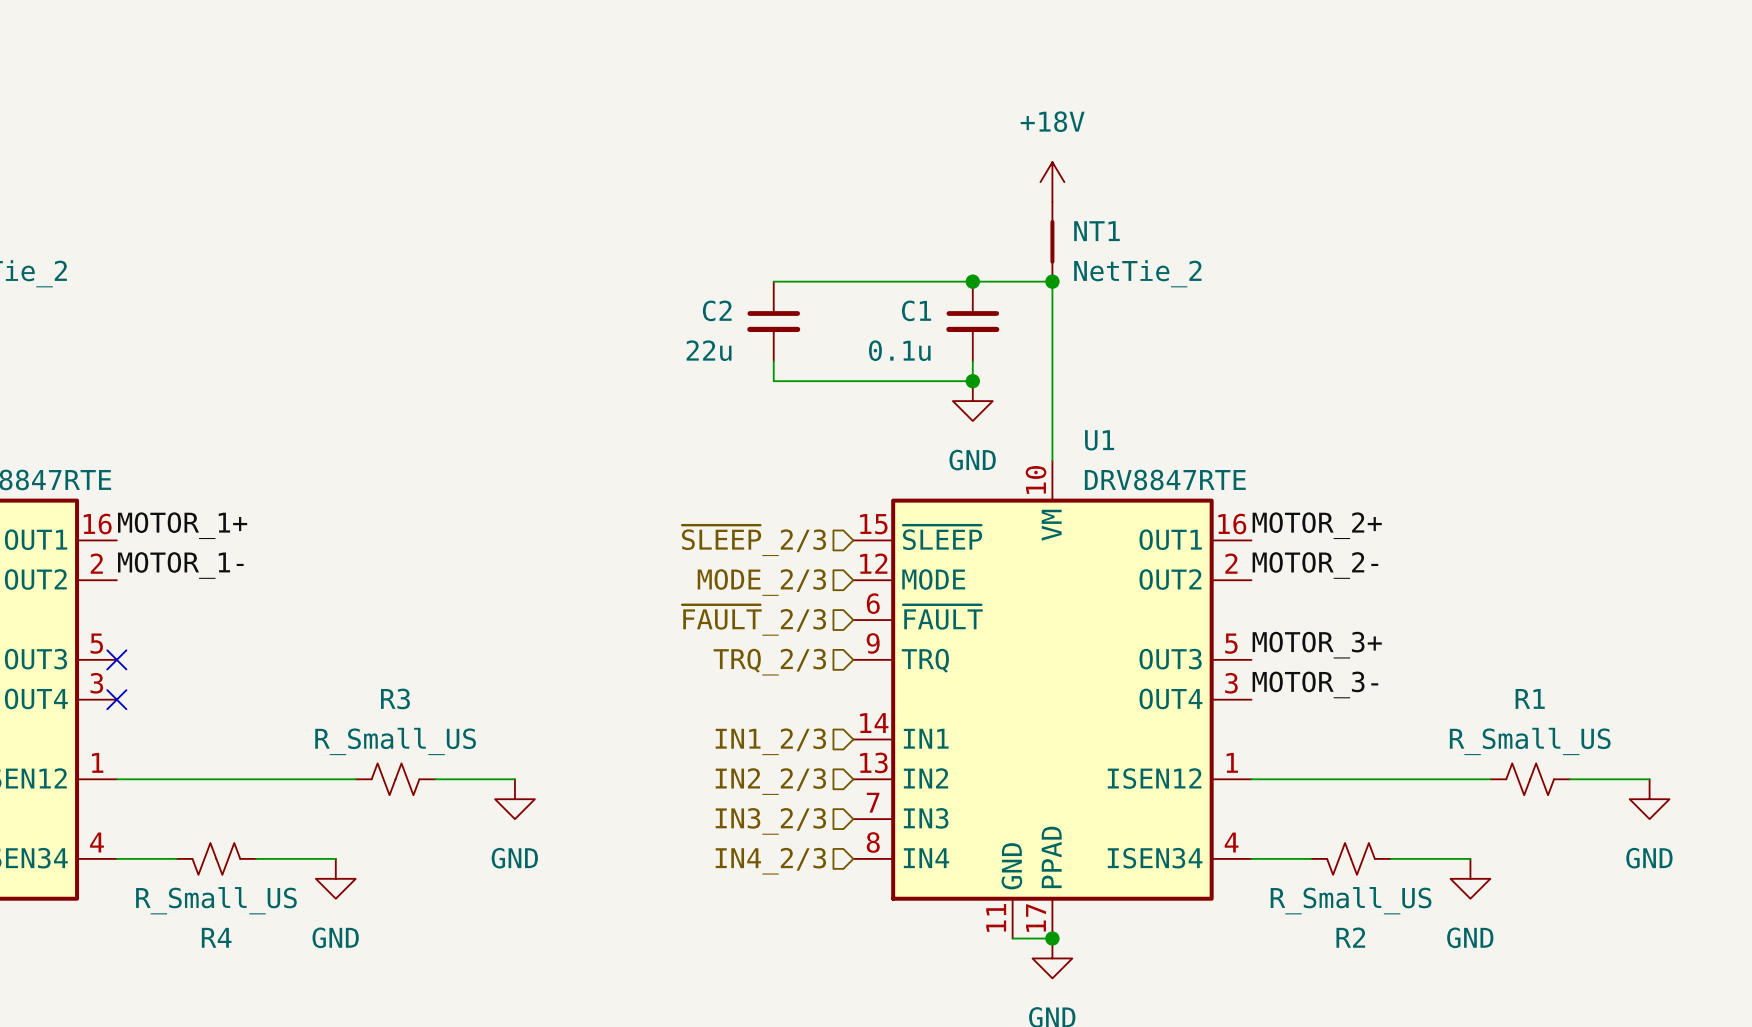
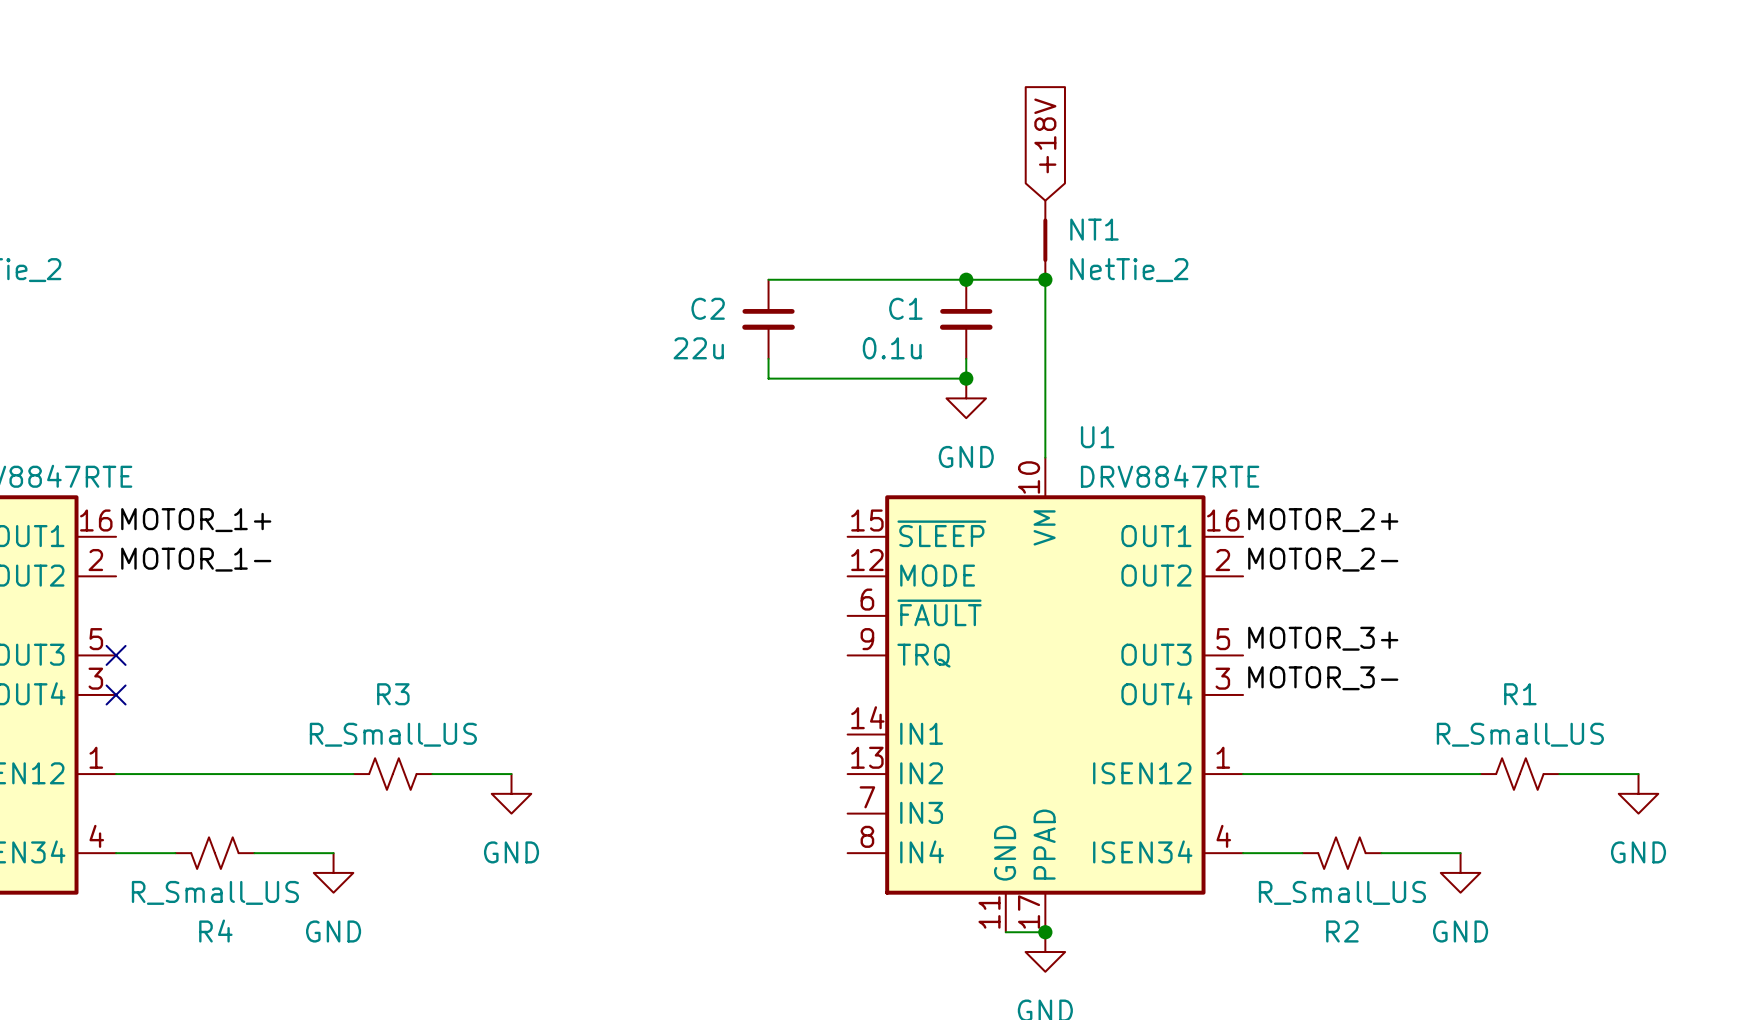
global label: none -> +18V (1045, 135)
power symbol: +18V (1052, 182) -> none
hierarchical label: ~{SLEEP}_2/3 (754, 540) -> none
hierarchical label: MODE_2/3 (761, 582) -> none
hierarchical label: ~{FAULT}_2/3 (754, 620) -> none
hierarchical label: TRQ_2/3 (769, 662) -> none
hierarchical label: IN1_2/3 (770, 741) -> none
hierarchical label: IN2_2/3 (770, 781) -> none
hierarchical label: IN3_2/3 (770, 821) -> none
hierarchical label: IN4_2/3 (770, 861) -> none

